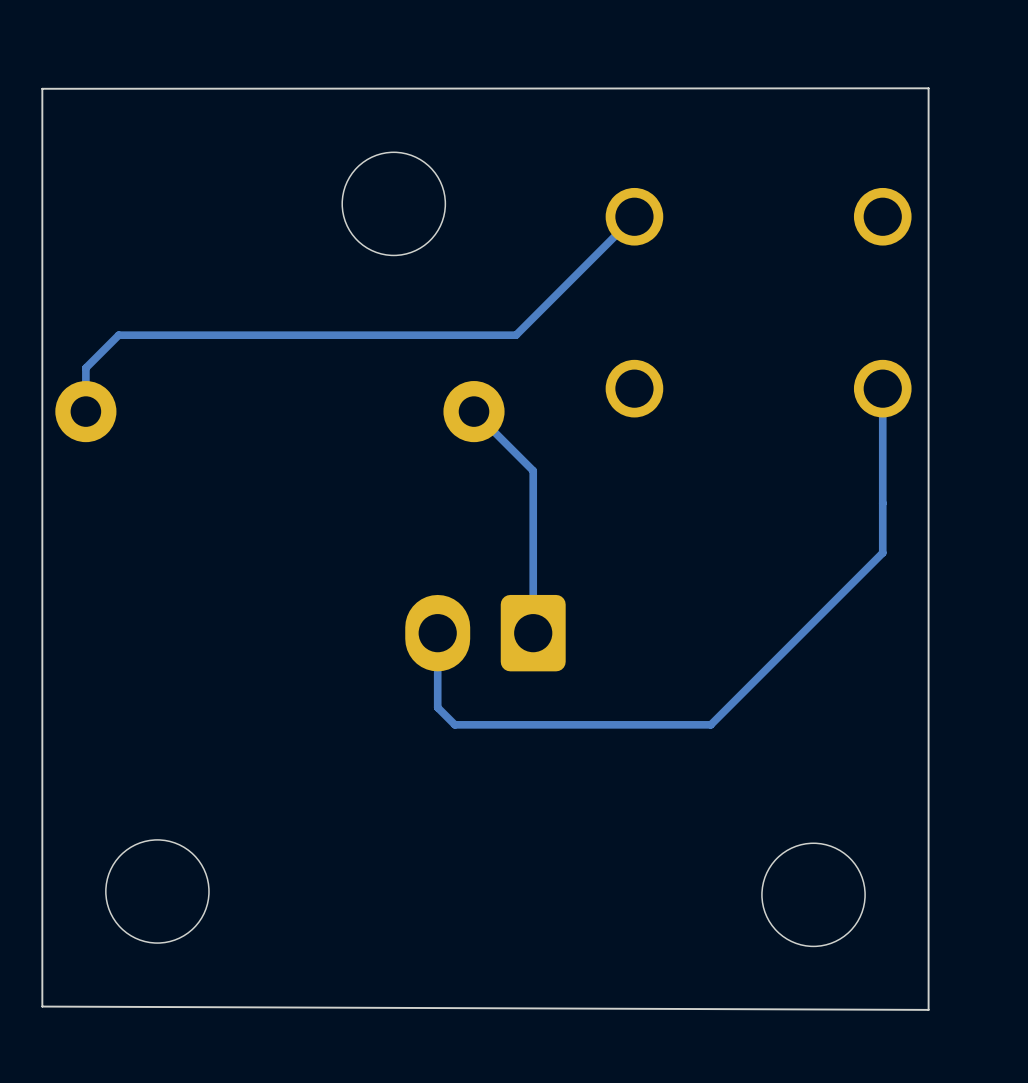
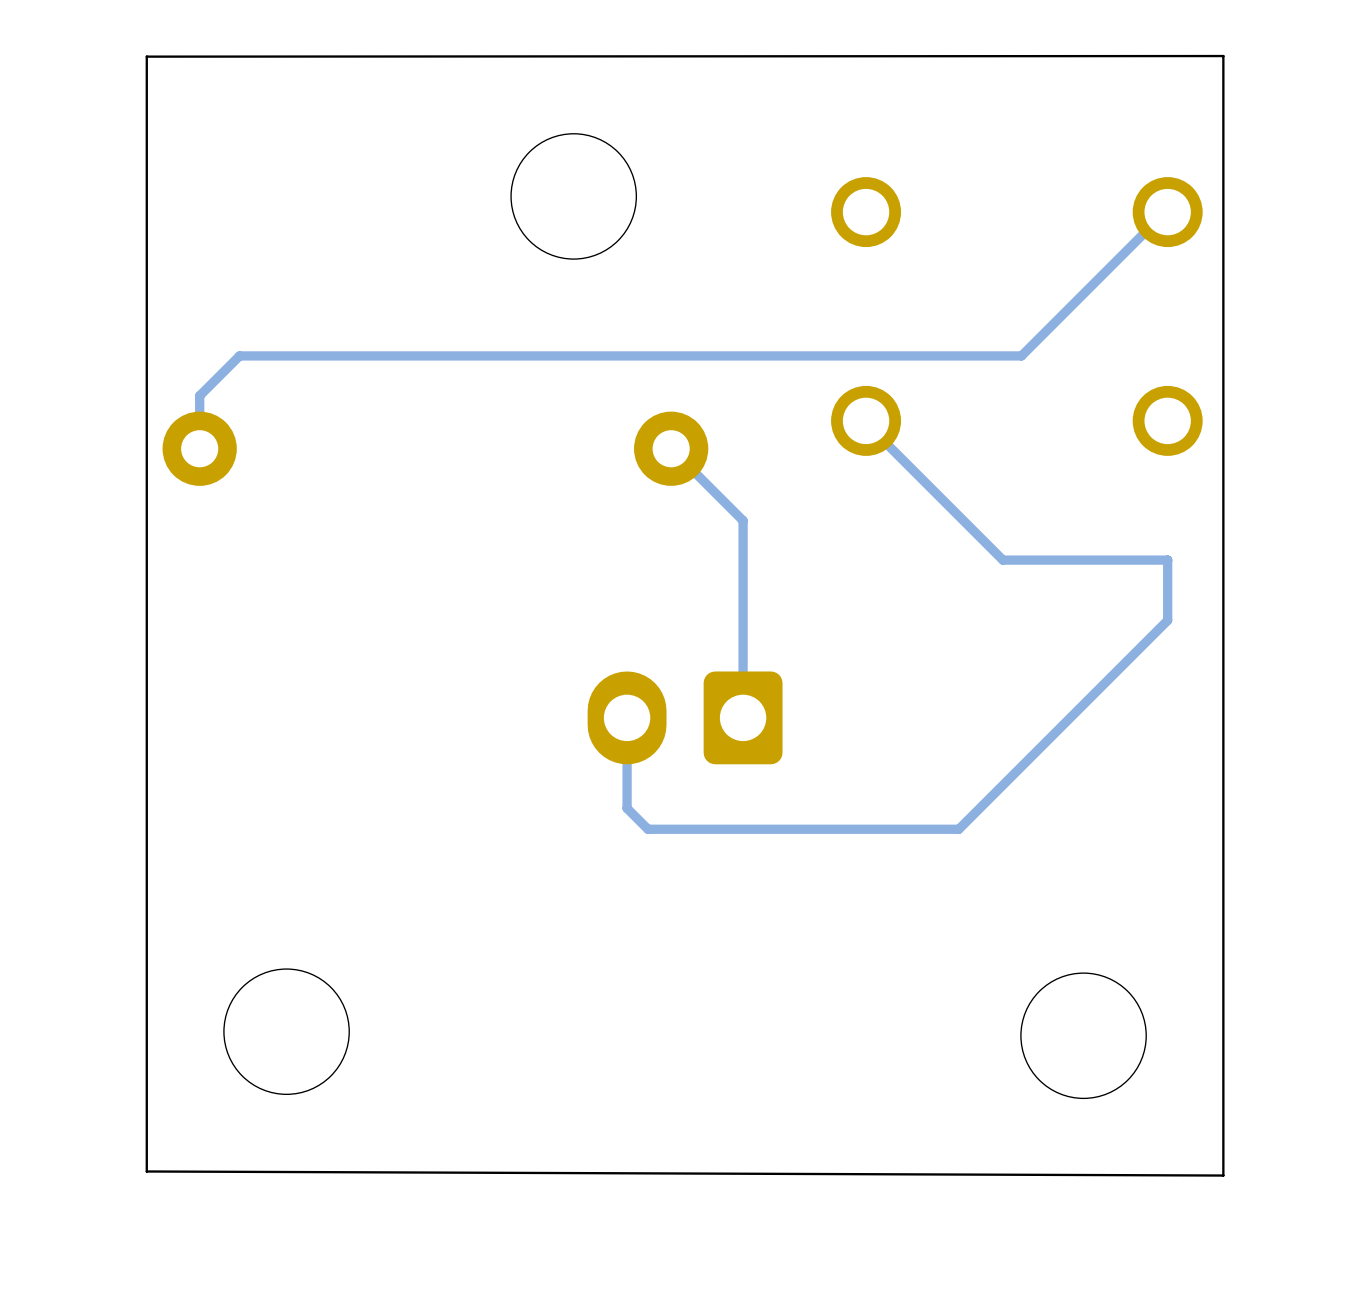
bottom track: (634, 216) (516, 335) -> (1165, 212) (1021, 355) (722, 355)
bottom track: (882, 388) (882, 503) -> (863, 420) (1002, 560) (1167, 560)

